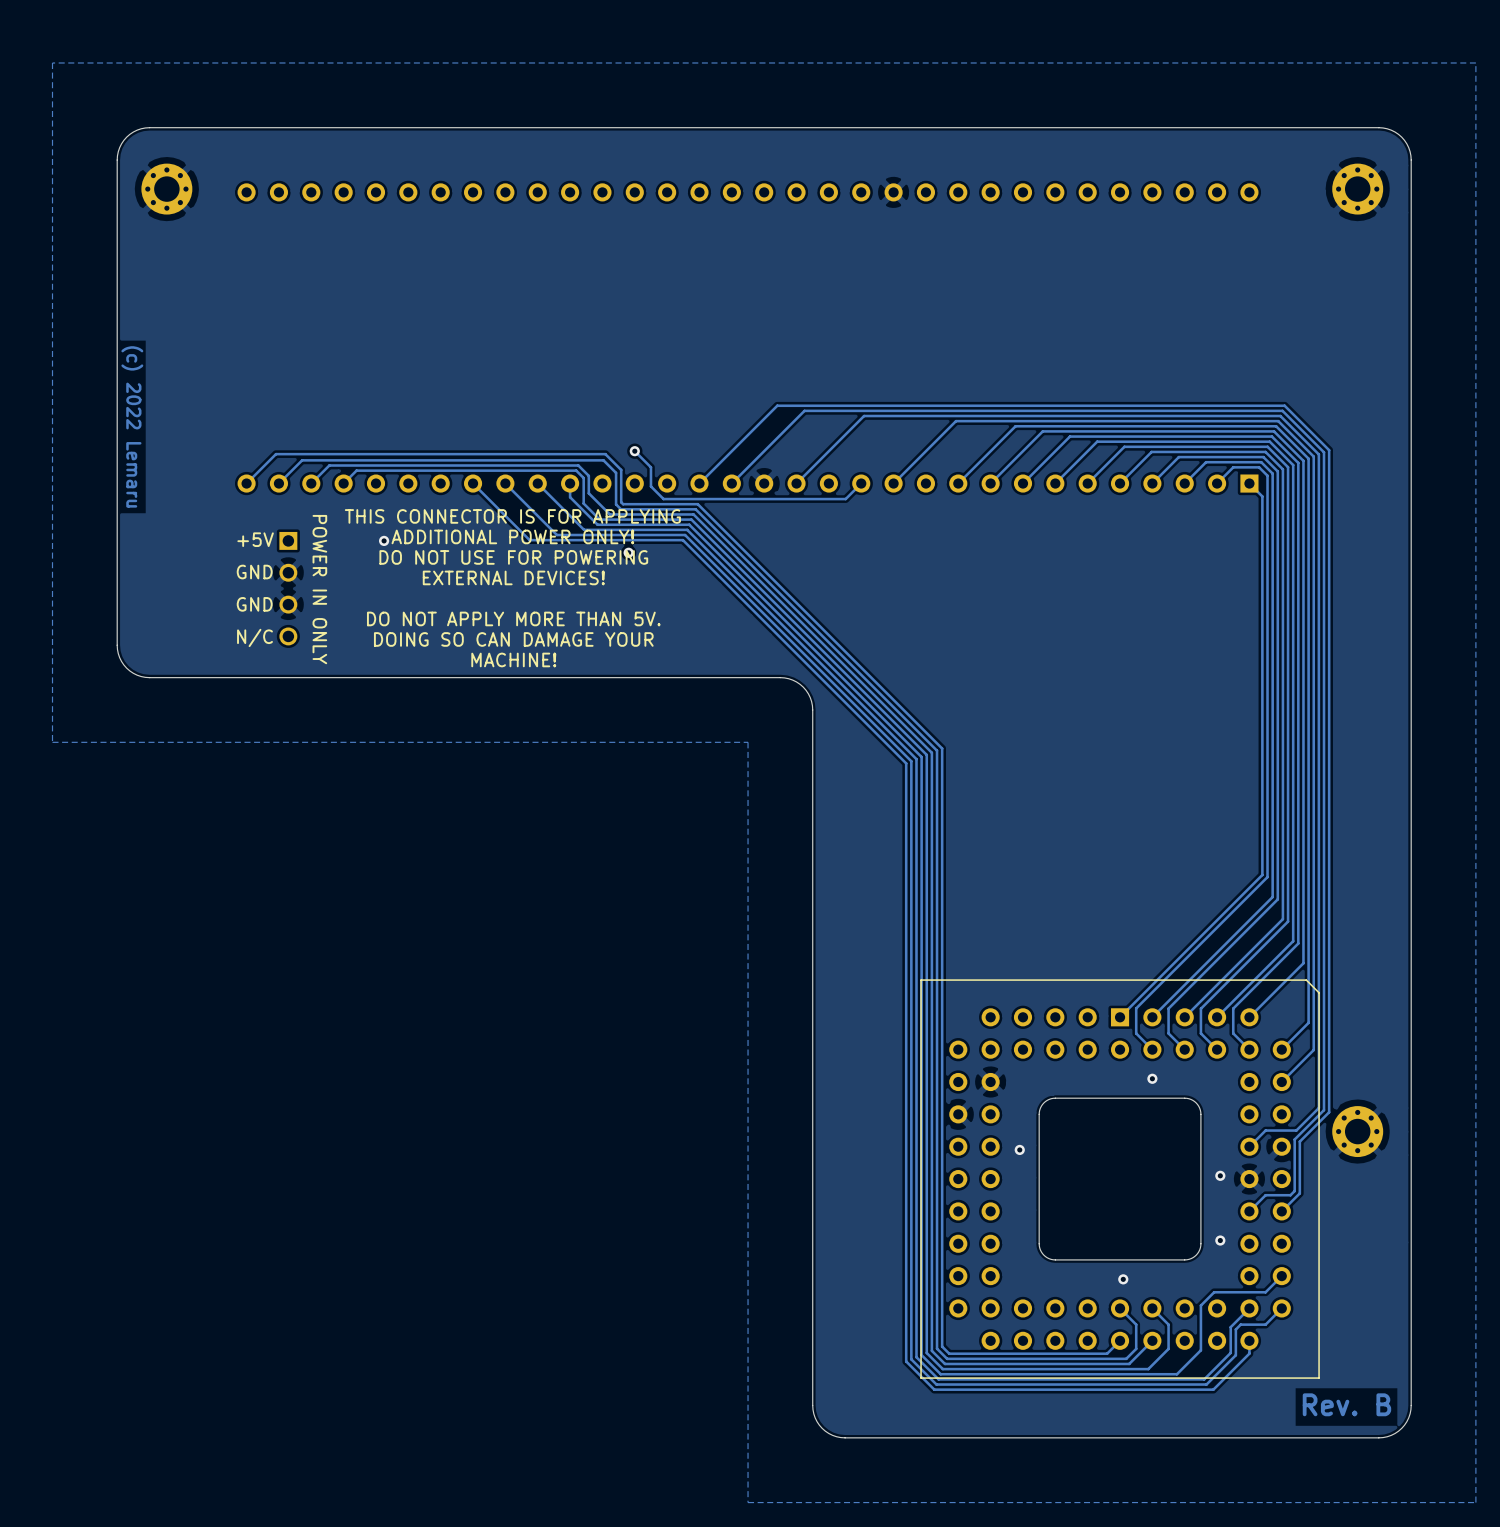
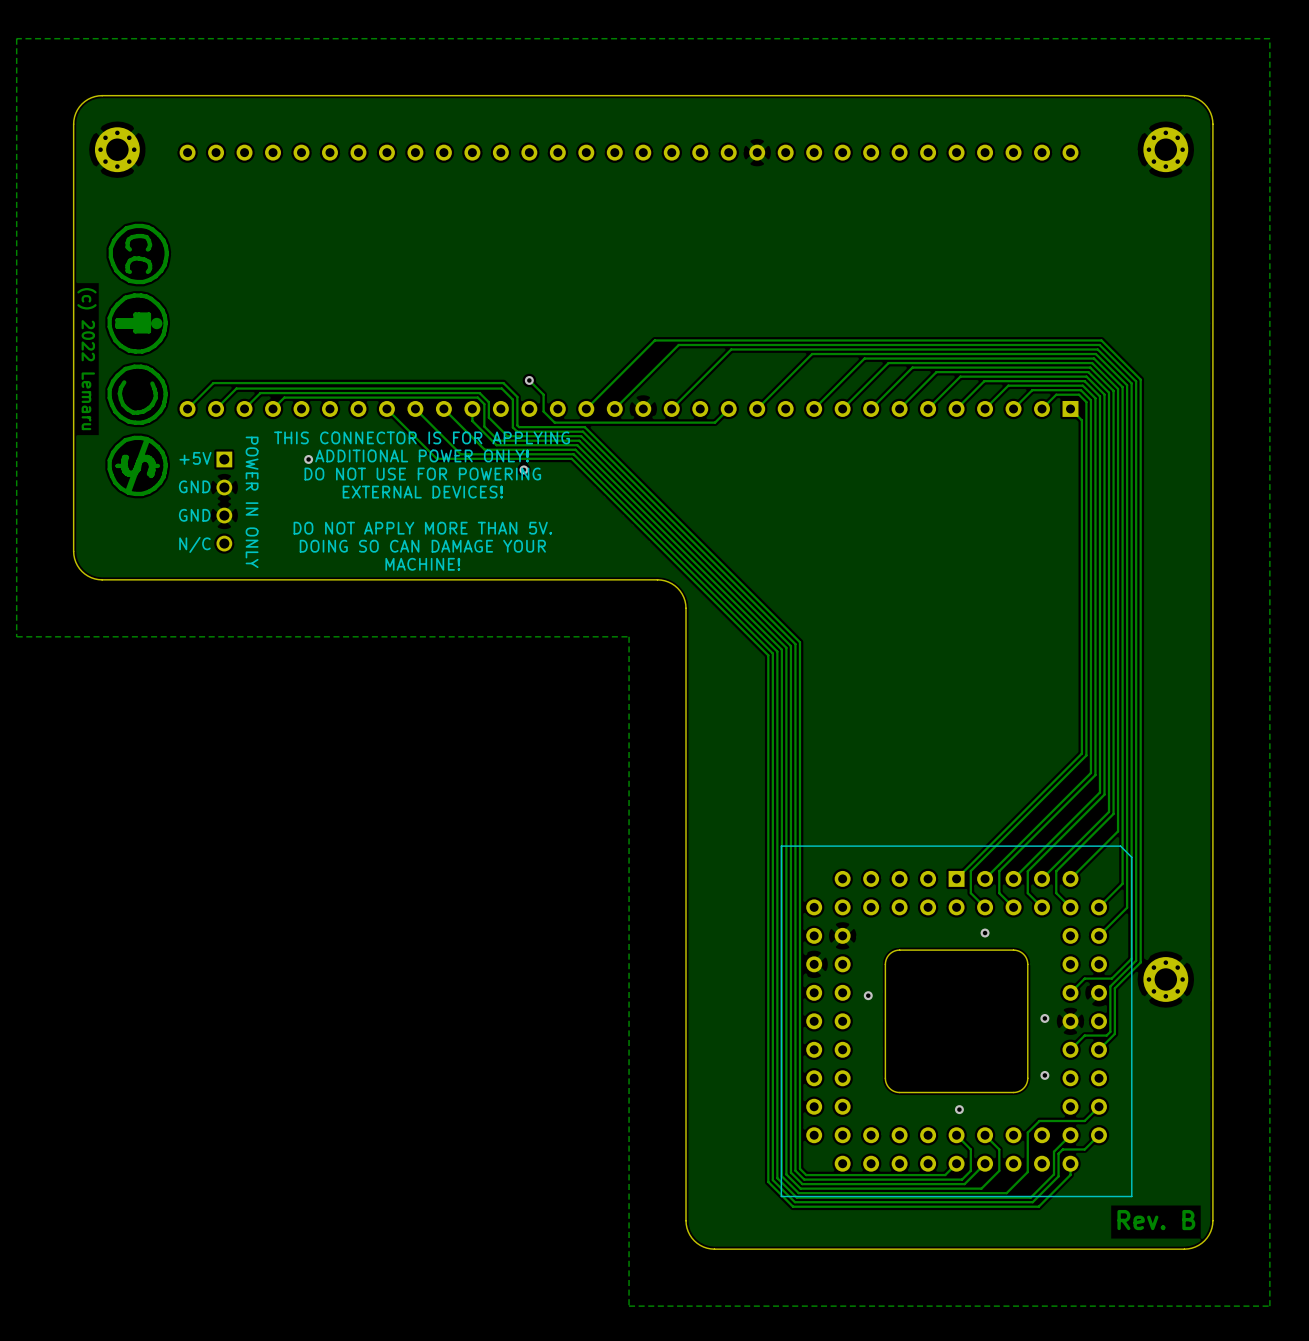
drawing: none -> [107, 223, 170, 497]

